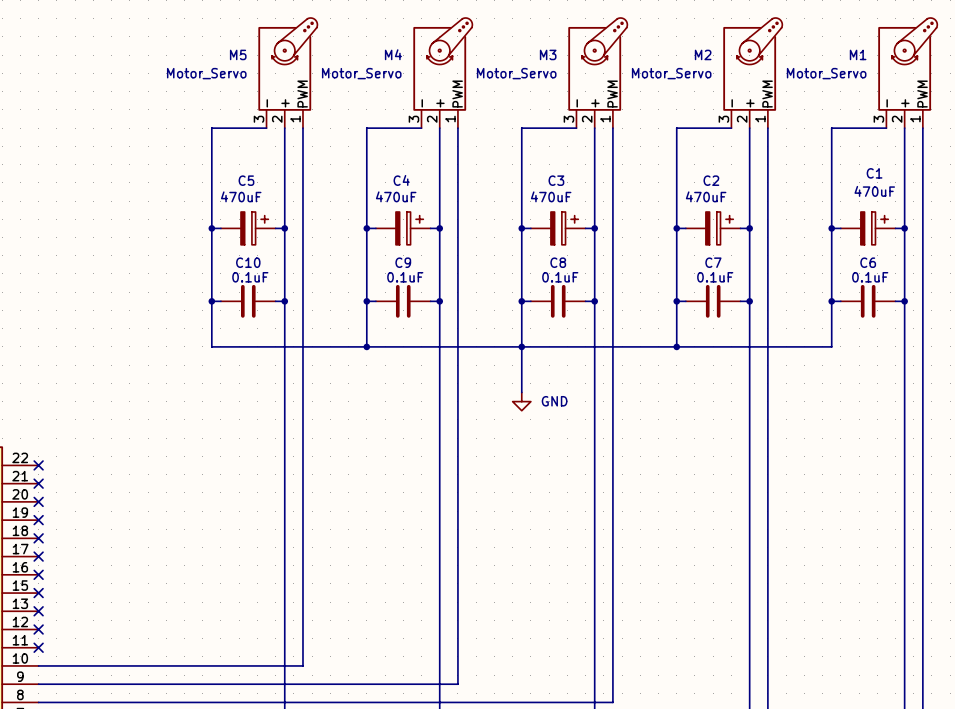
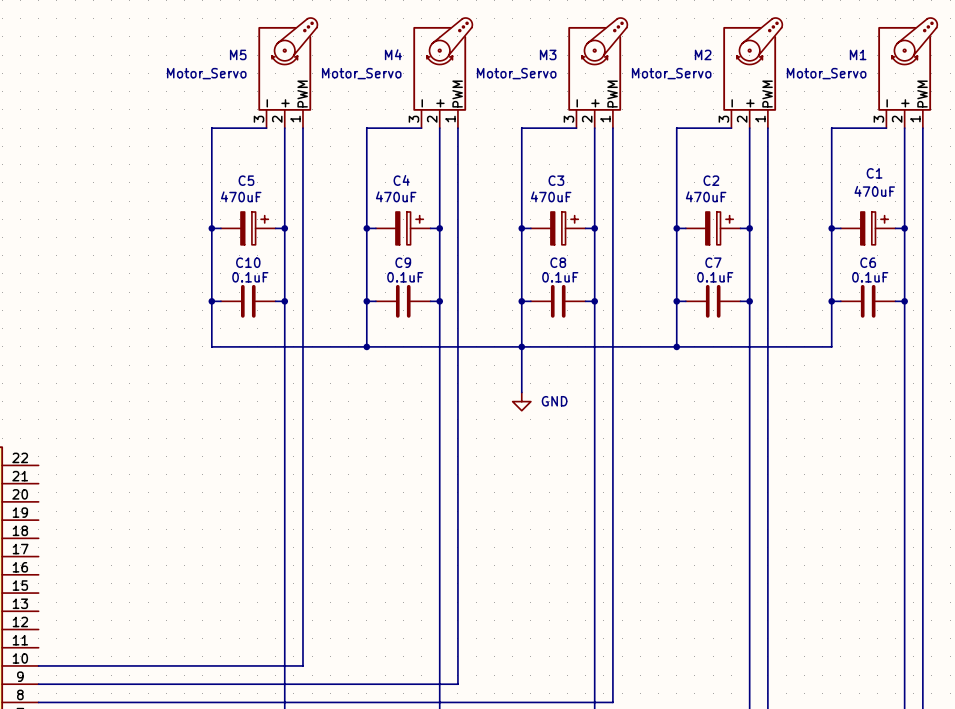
no-connect mark: (38, 465) -> none
no-connect mark: (38, 483) -> none
no-connect mark: (38, 501) -> none
no-connect mark: (38, 520) -> none
no-connect mark: (38, 538) -> none
no-connect mark: (38, 556) -> none
no-connect mark: (38, 574) -> none
no-connect mark: (38, 593) -> none
no-connect mark: (38, 611) -> none
no-connect mark: (38, 629) -> none
no-connect mark: (38, 647) -> none

